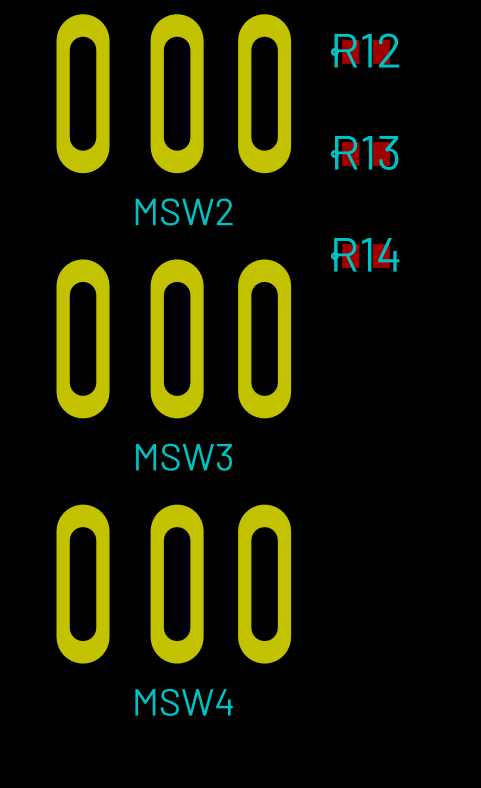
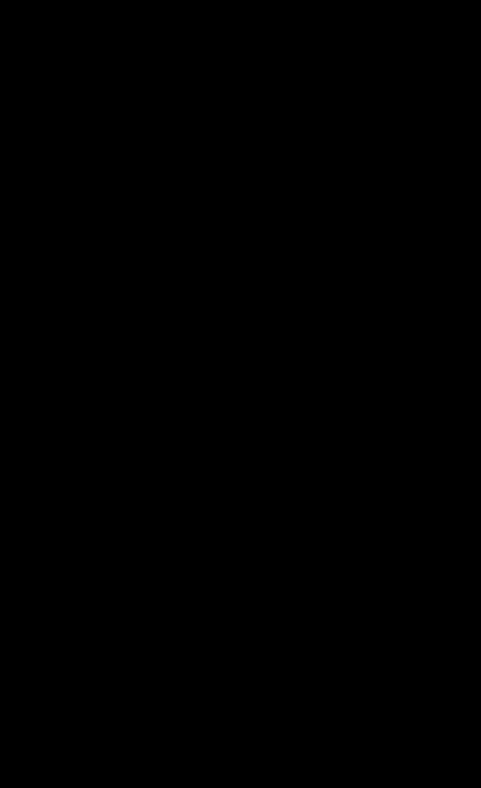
R12: (360, 51) -> none
MSW2: (173, 93) -> none
R13: (360, 154) -> none
R14: (360, 256) -> none
MSW3: (173, 338) -> none
MSW4: (173, 584) -> none

